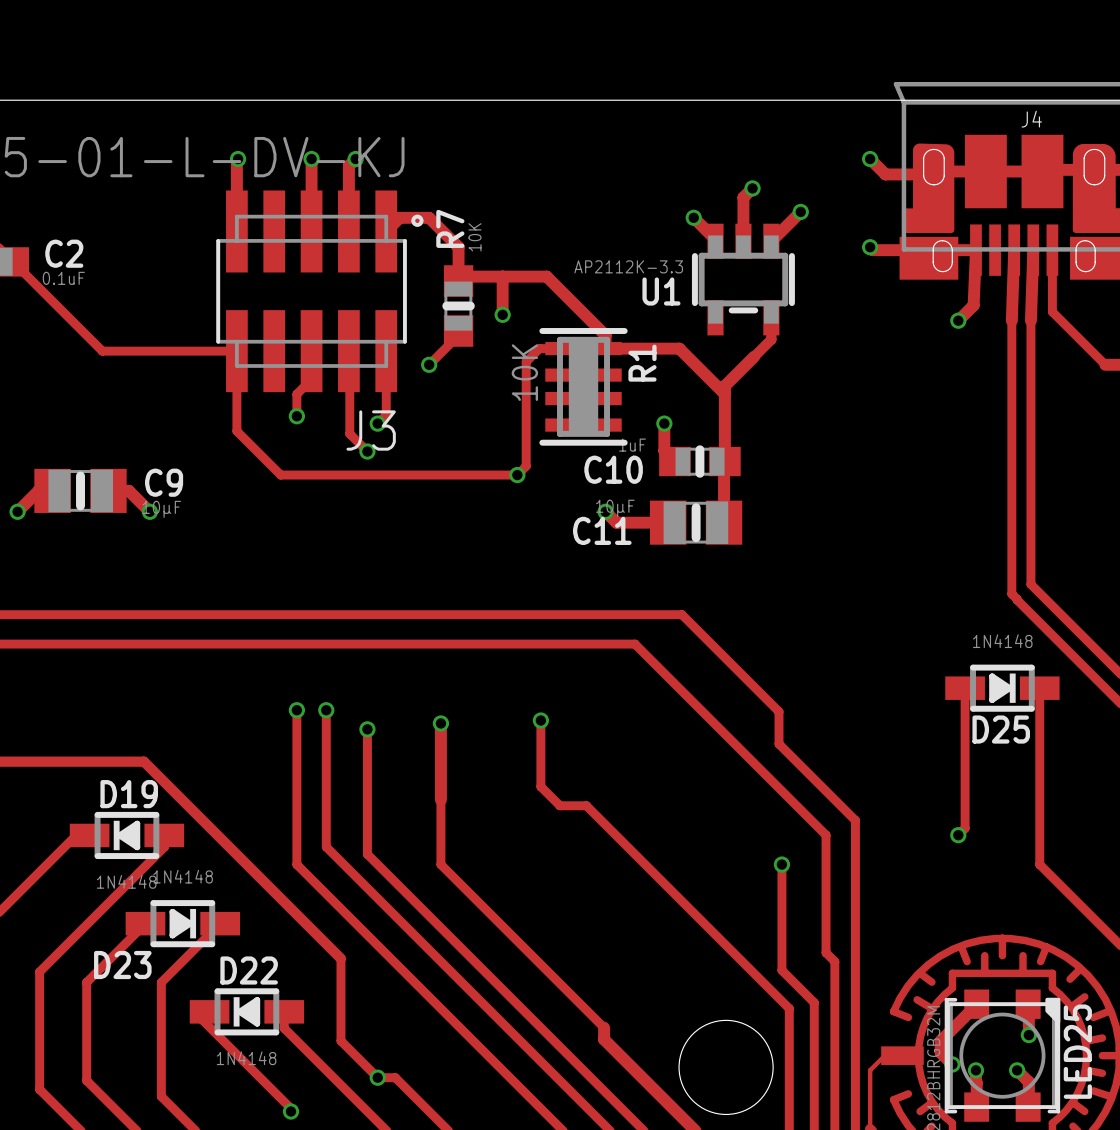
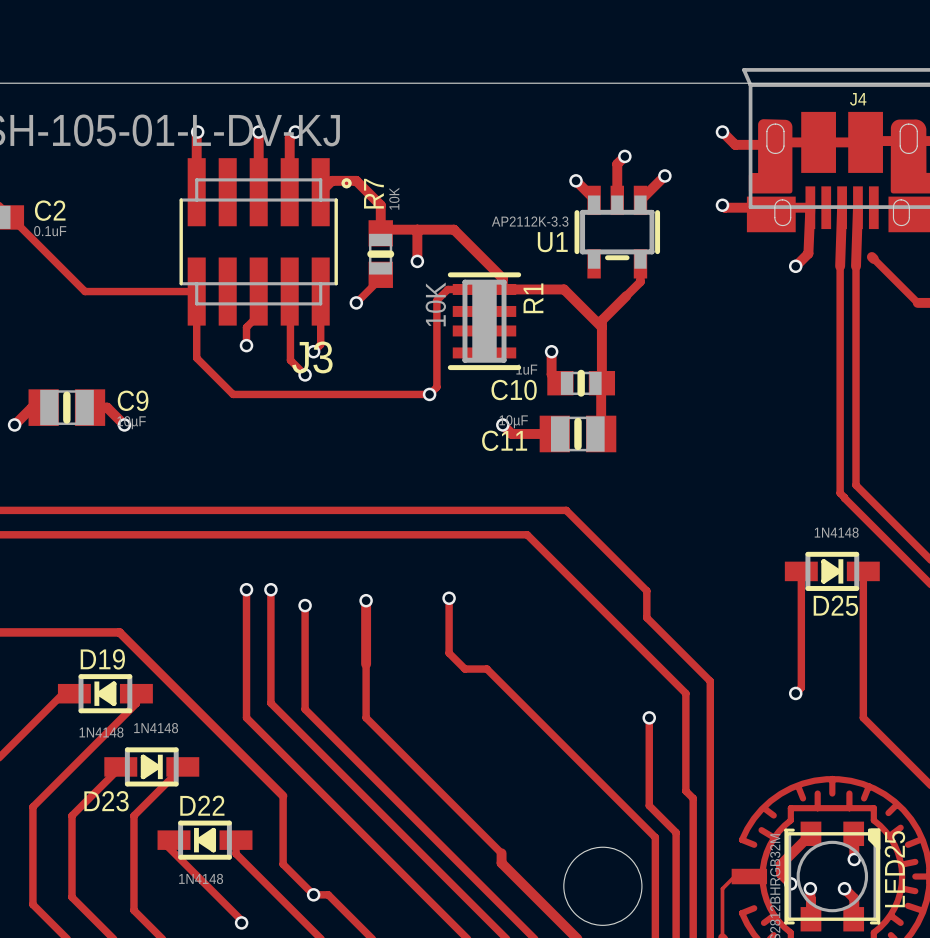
track: (1052, 250) (1052, 311) -> (871, 257) (873, 258)

